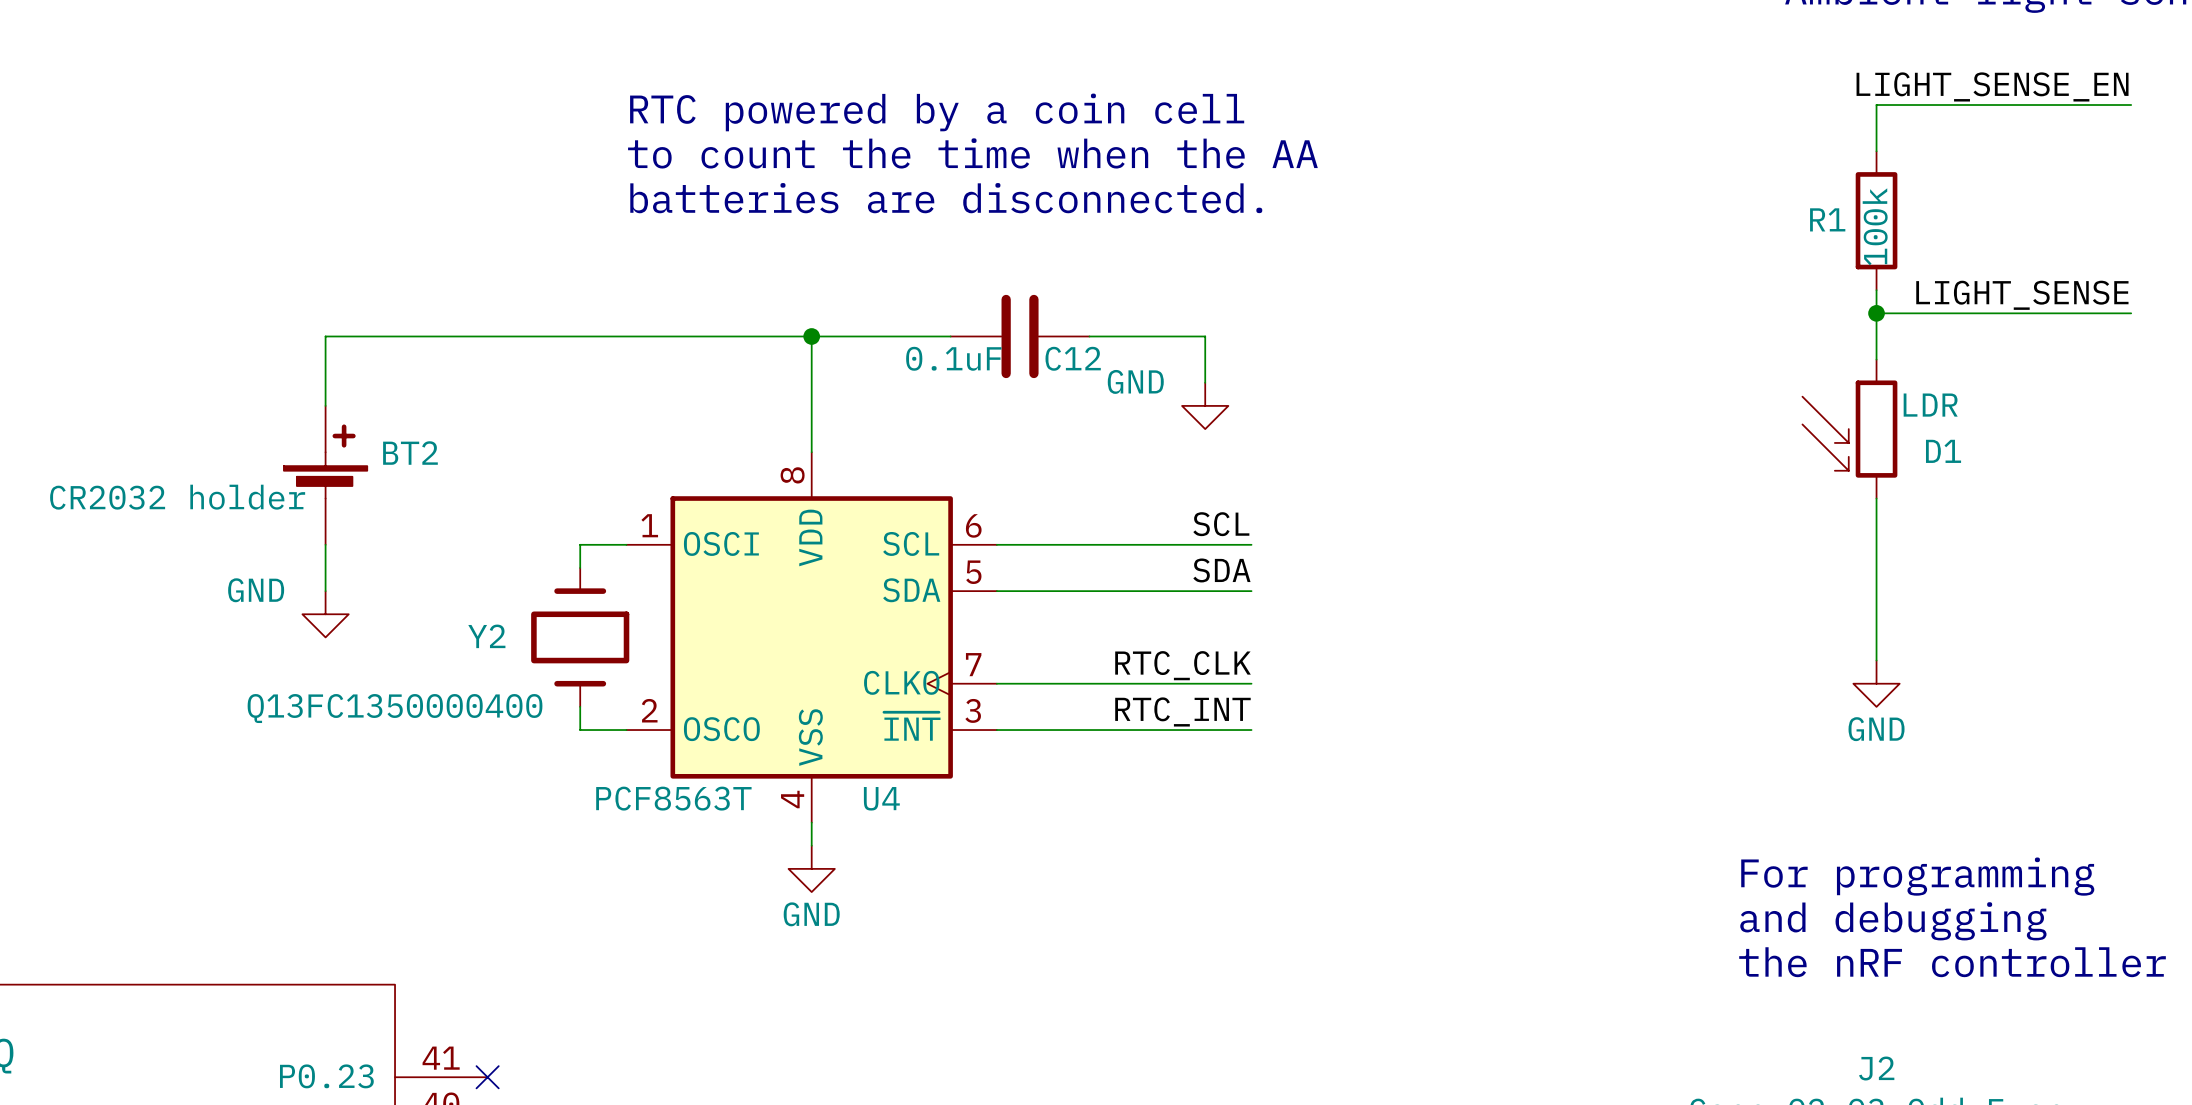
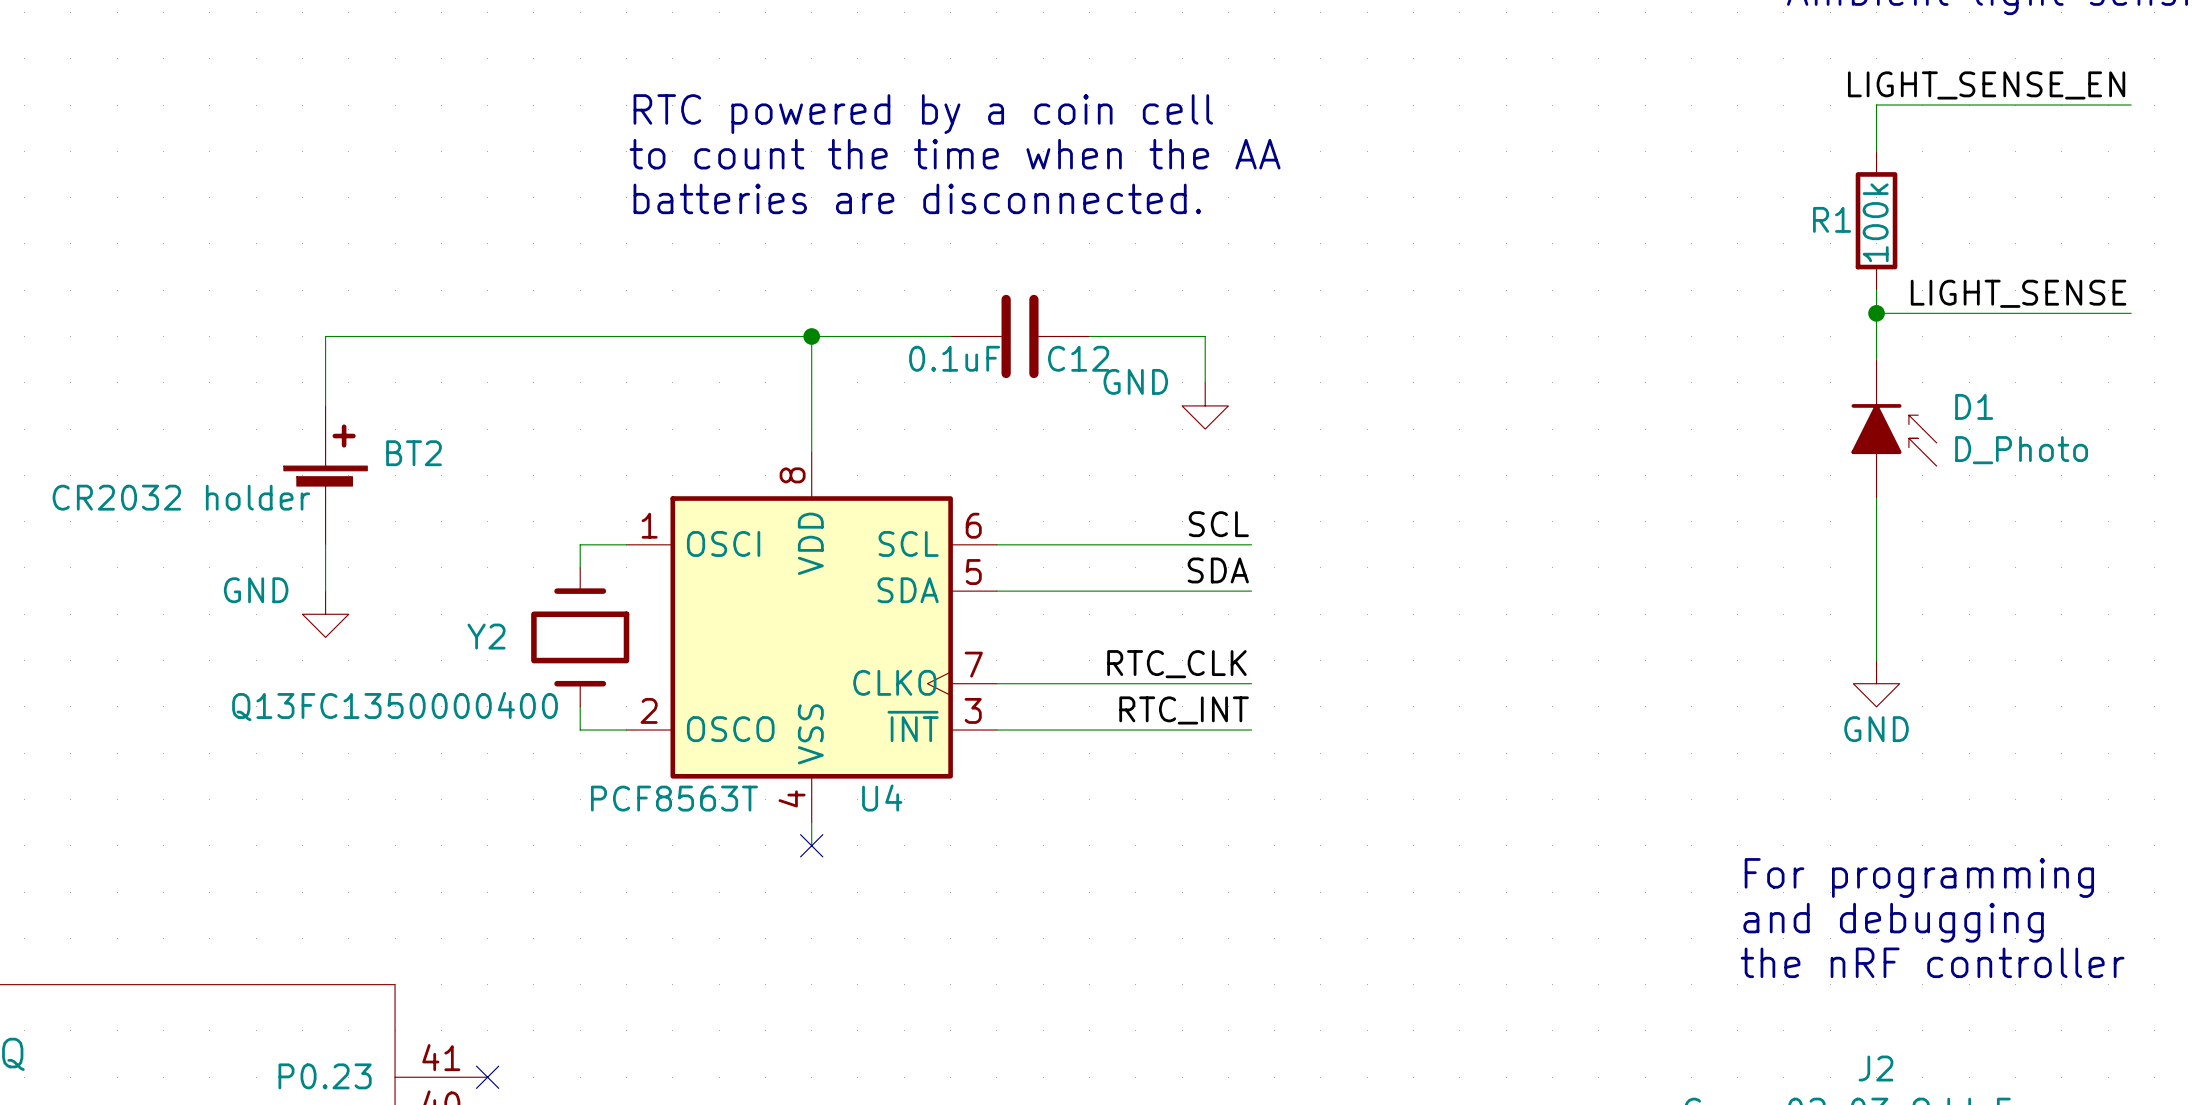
D1 symbol: [1802, 359, 1898, 499] -> [1851, 359, 1937, 499]
D1 value: LDR (1930, 405) -> D_Photo (2021, 450)
D1 name position: D1 (1943, 451) -> D1 (1974, 406)
no-connect mark: none -> (811, 845)
power symbol: GND (811, 868) -> none

